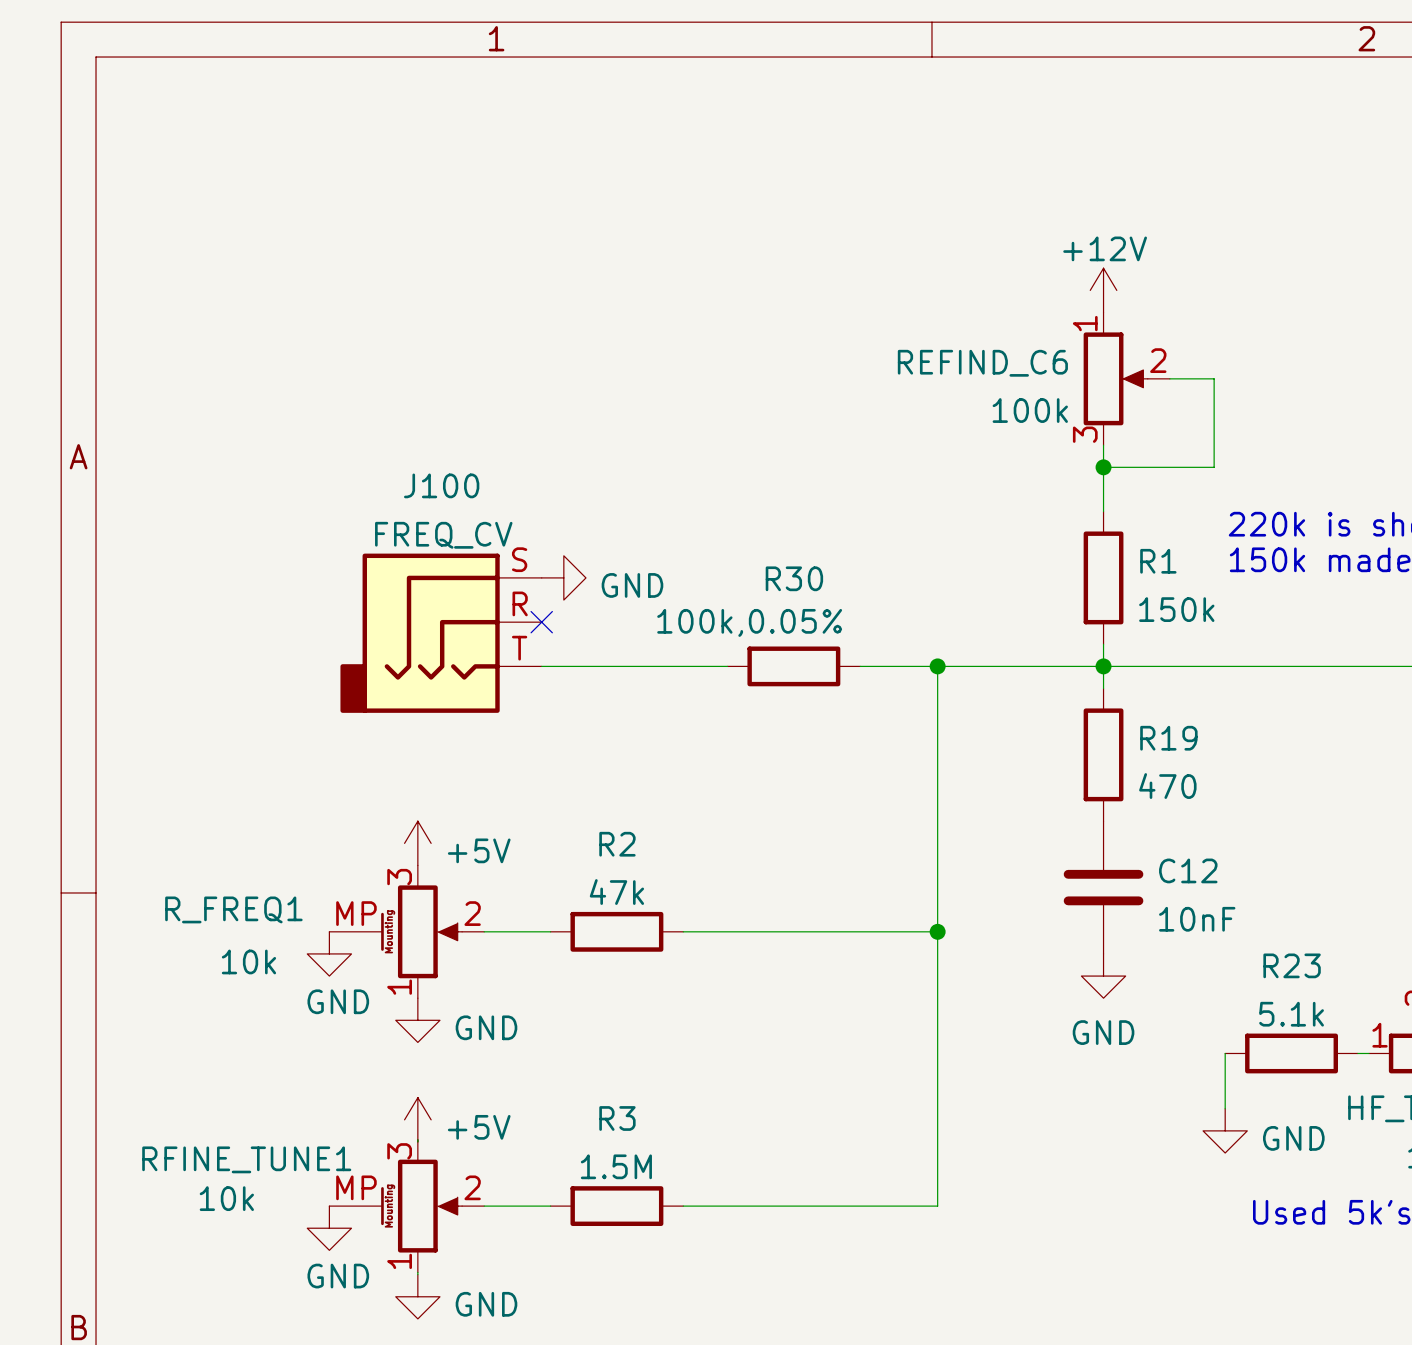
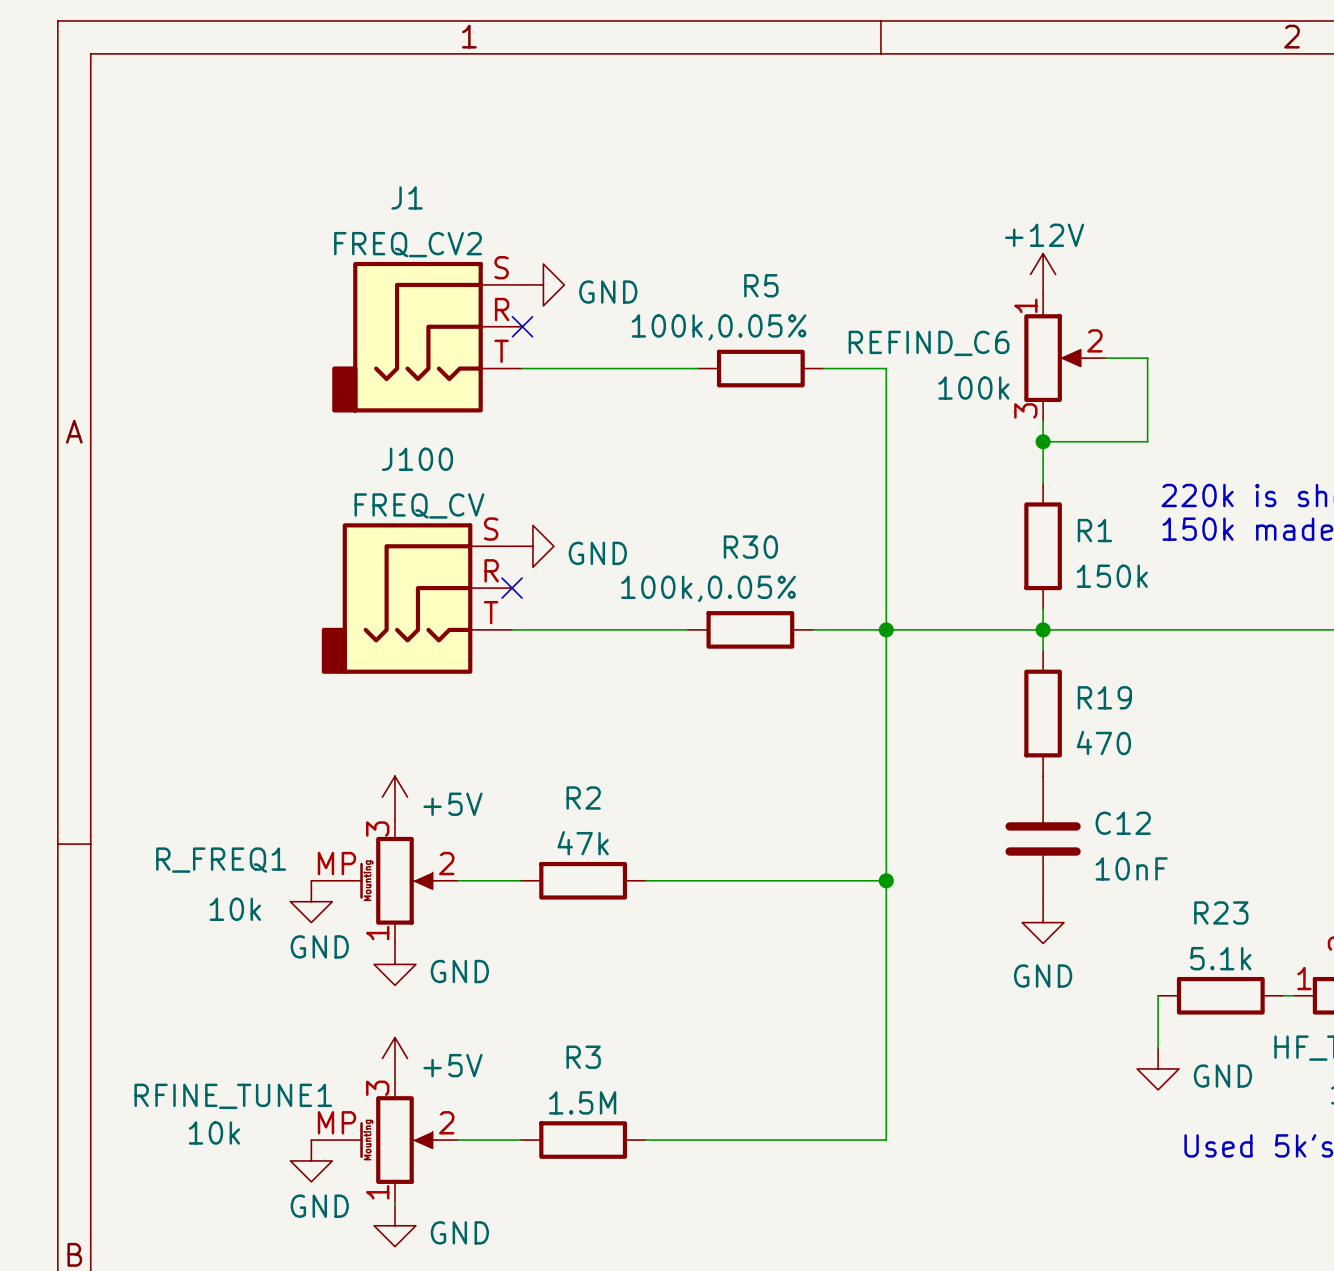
power symbol: none -> GND (543, 284)
no-connect mark: none -> (522, 326)
J1: none -> FREQ_CV2 (427, 337)
wire: none -> (522, 368) (698, 368)
R5: none -> 100k,0.05% (760, 368)
wire: none -> (823, 368) (886, 368) (886, 629)

